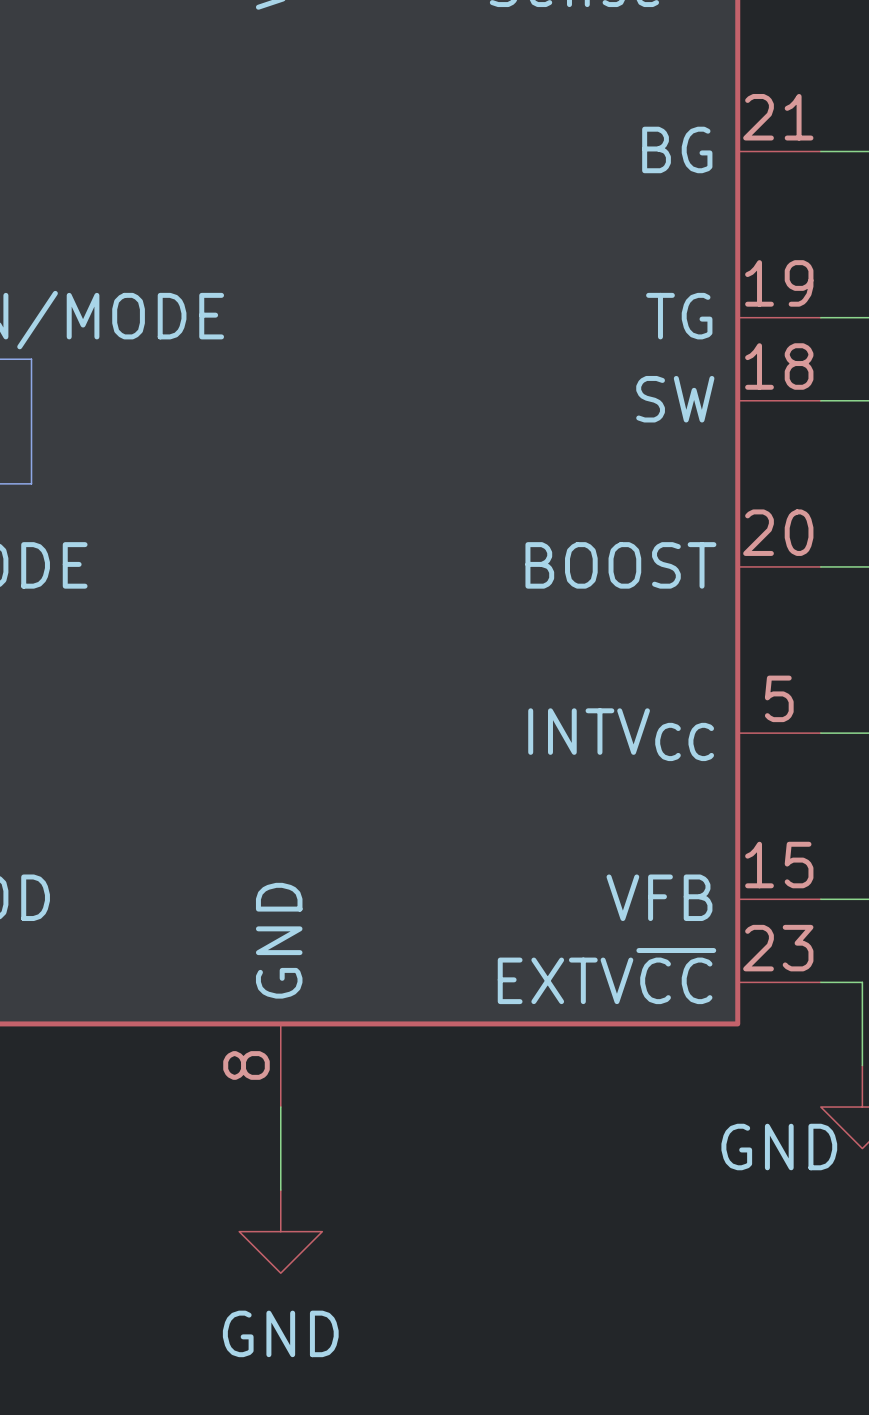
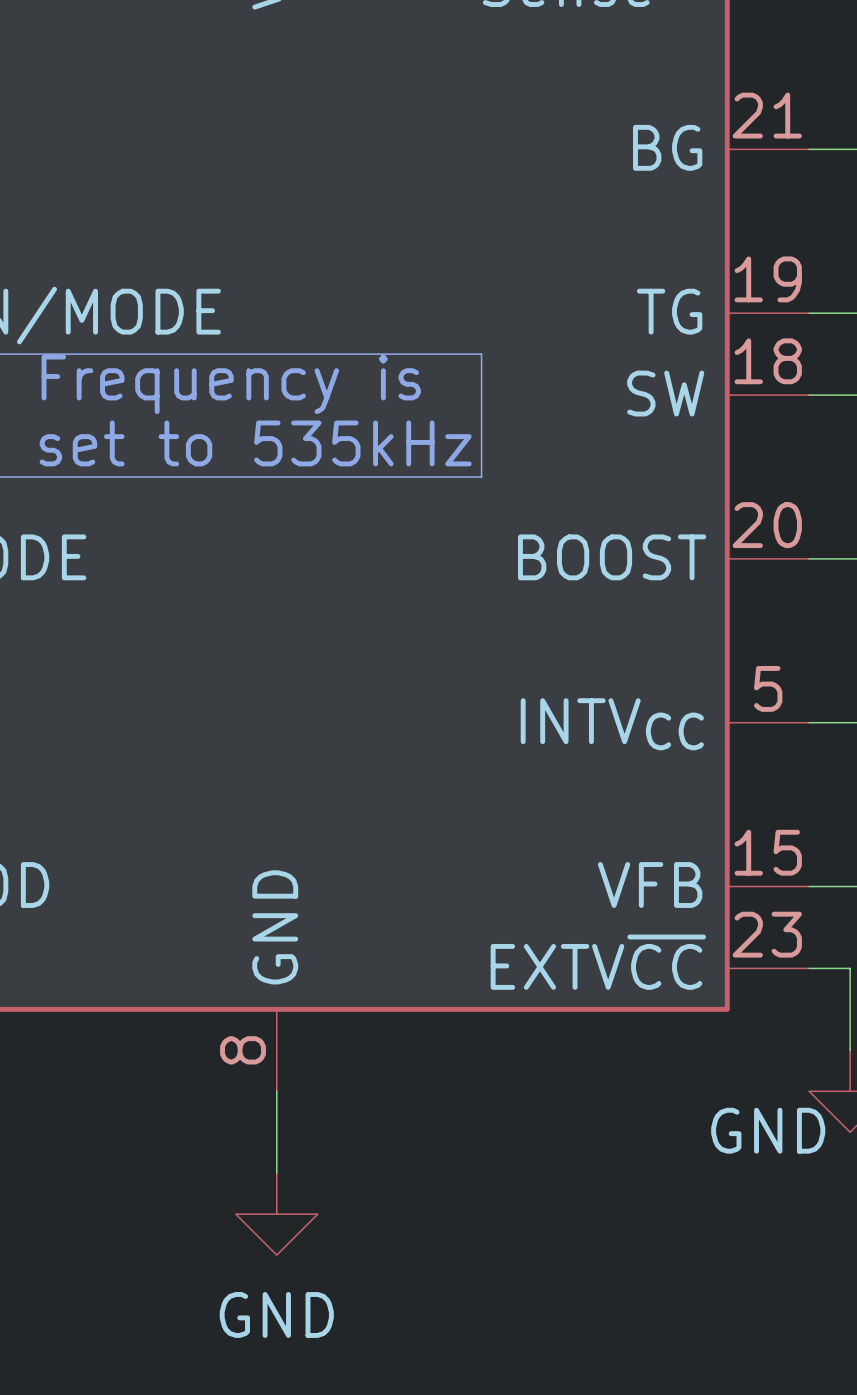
line: (31, 359) (31, 483) -> (31, 354) (481, 354) (481, 476) (31, 476)
text: none -> Frequency is (231, 384)
text: none -> set to 535kHz (255, 443)

